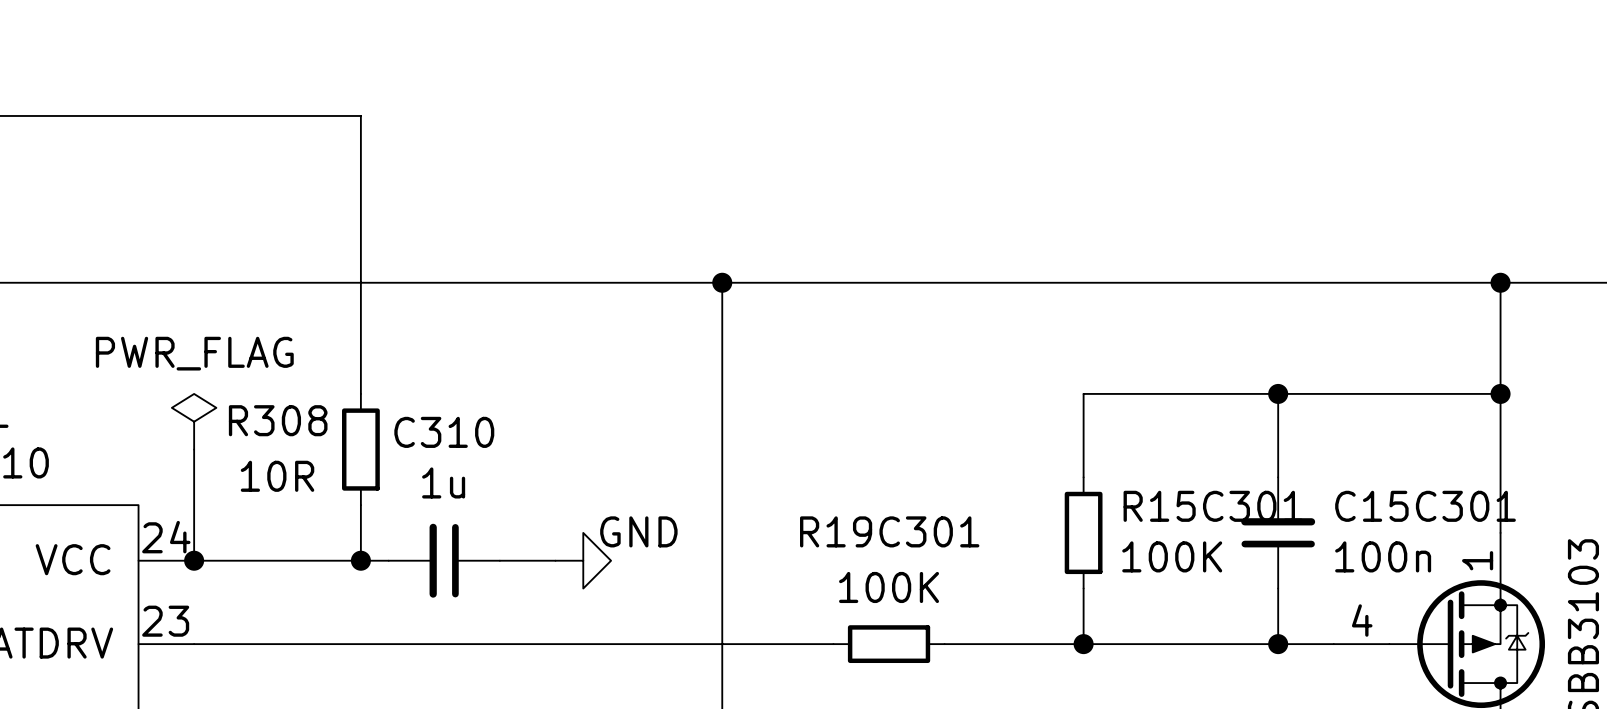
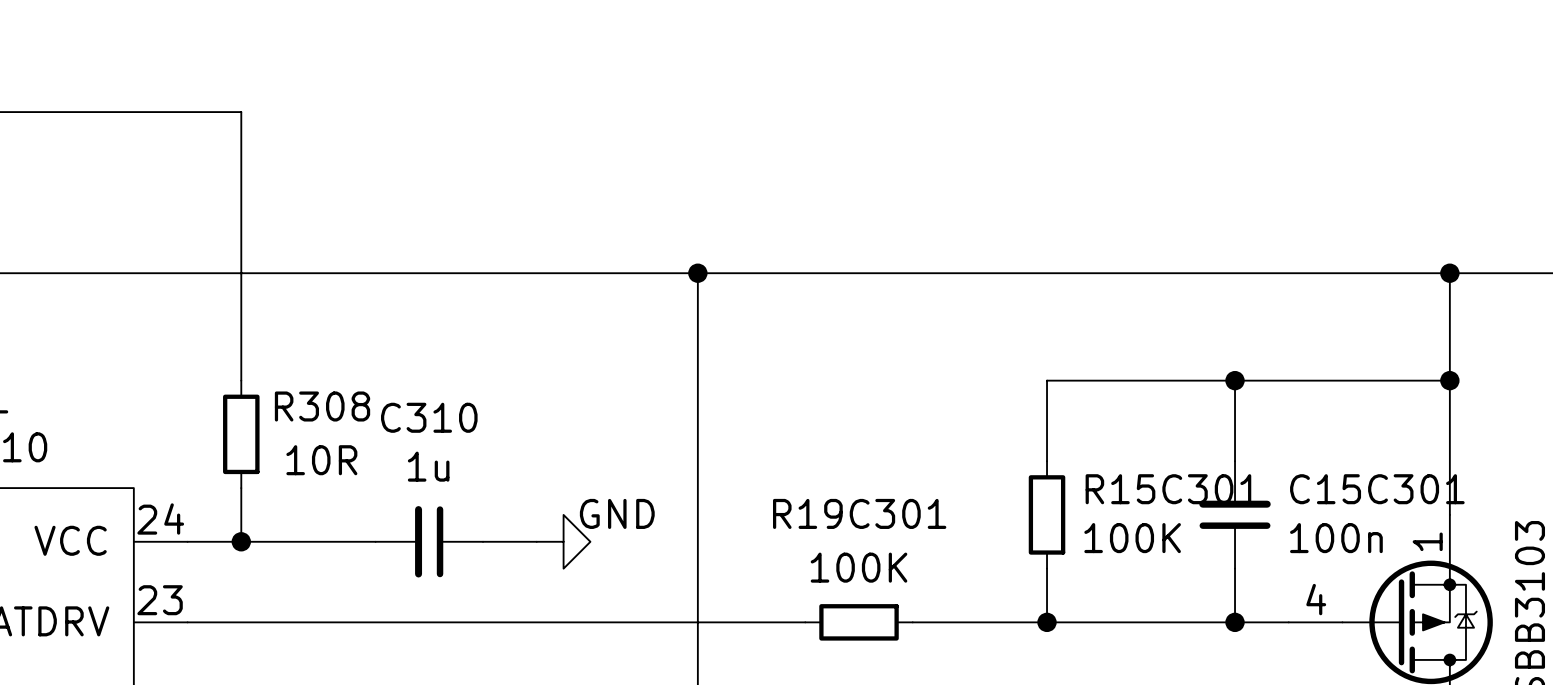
wire: (249, 115) (360, 115) (360, 393) -> (241, 112) (241, 380)
R308 name position: R308 (278, 420) -> R308 (322, 406)
power symbol: PWR_FLAG (194, 421) -> none
wire: (194, 449) (194, 560) -> none
R308 position: (360, 449) -> (241, 434)
R308 value position: 10R (277, 476) -> 10R (321, 460)
wire: (360, 505) (360, 560) -> (241, 488) (241, 541)
junction: (194, 560) -> none
junction: none -> (241, 541)
junction: (360, 560) -> none

